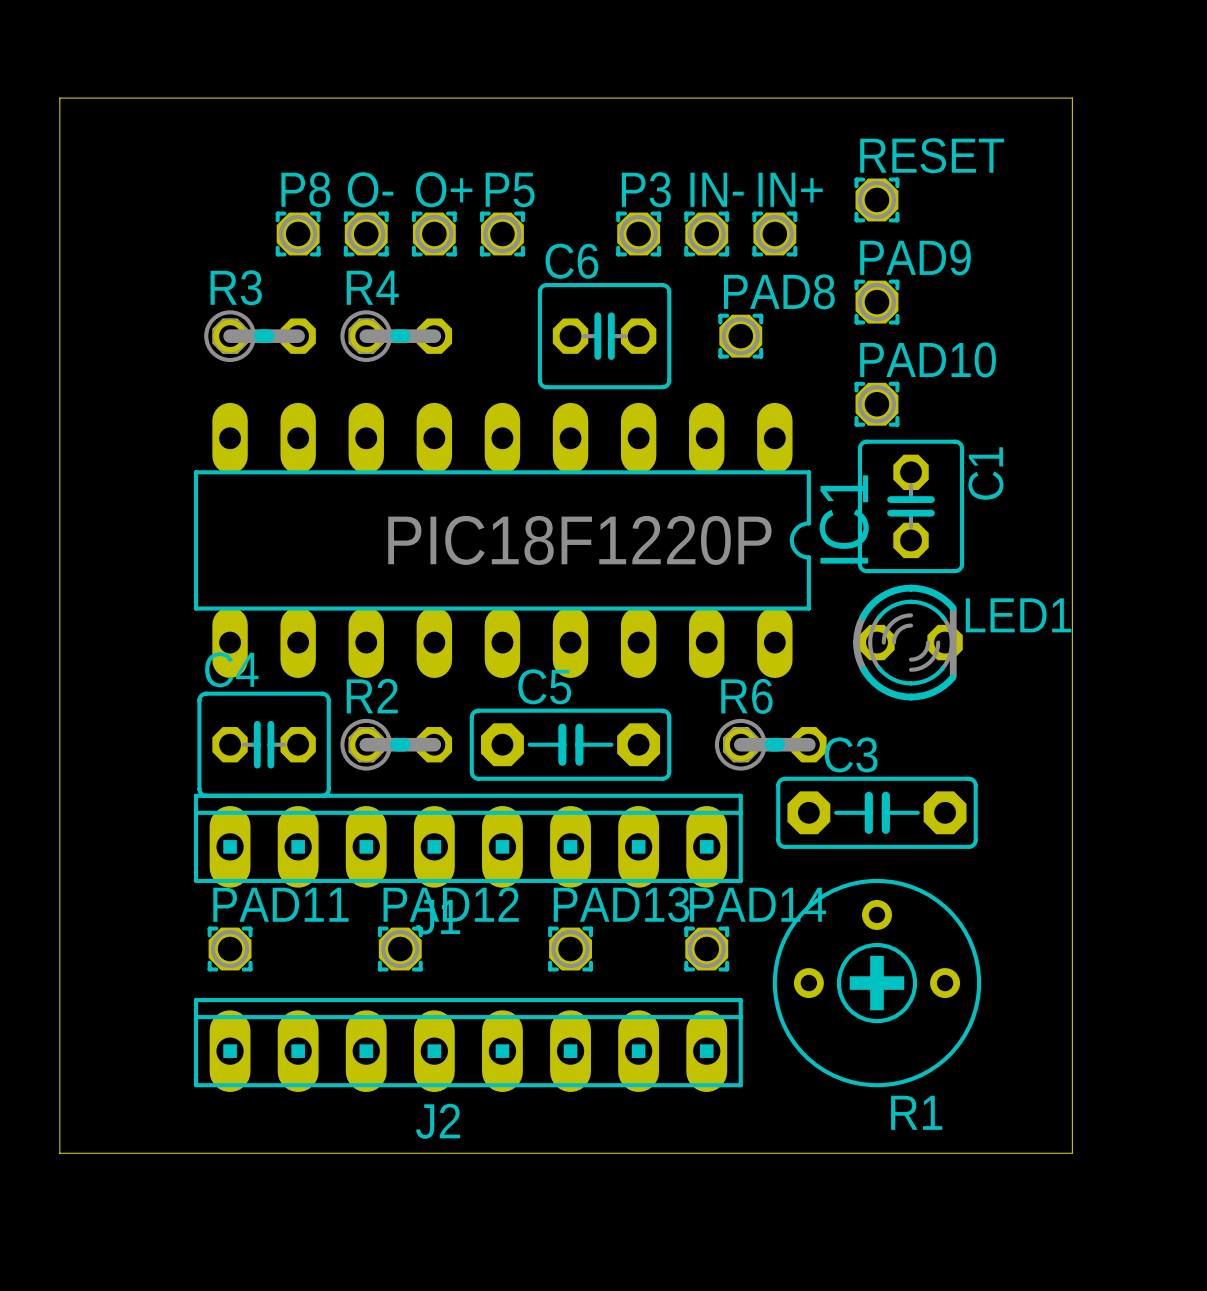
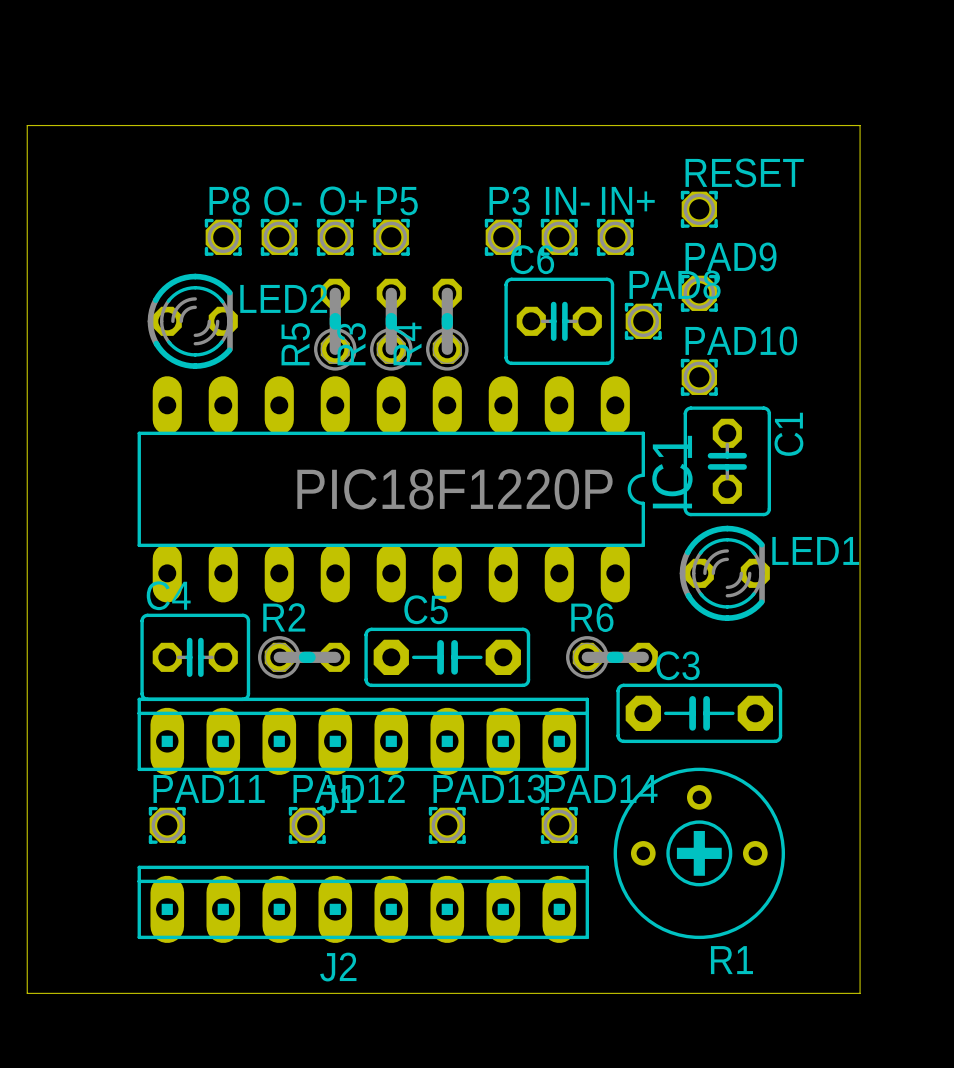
R3 rotation: 0° (260, 336) -> 90° counterclockwise (391, 324)
R3 position: (260, 336) -> (391, 324)
LED2: none -> (192, 321)
R4 rotation: 0° (396, 336) -> 90° counterclockwise (447, 324)
R4 position: (396, 336) -> (447, 324)
C6 position: (604, 336) -> (559, 321)
PAD8 position: (740, 336) -> (643, 321)
R5: none -> (335, 324)

